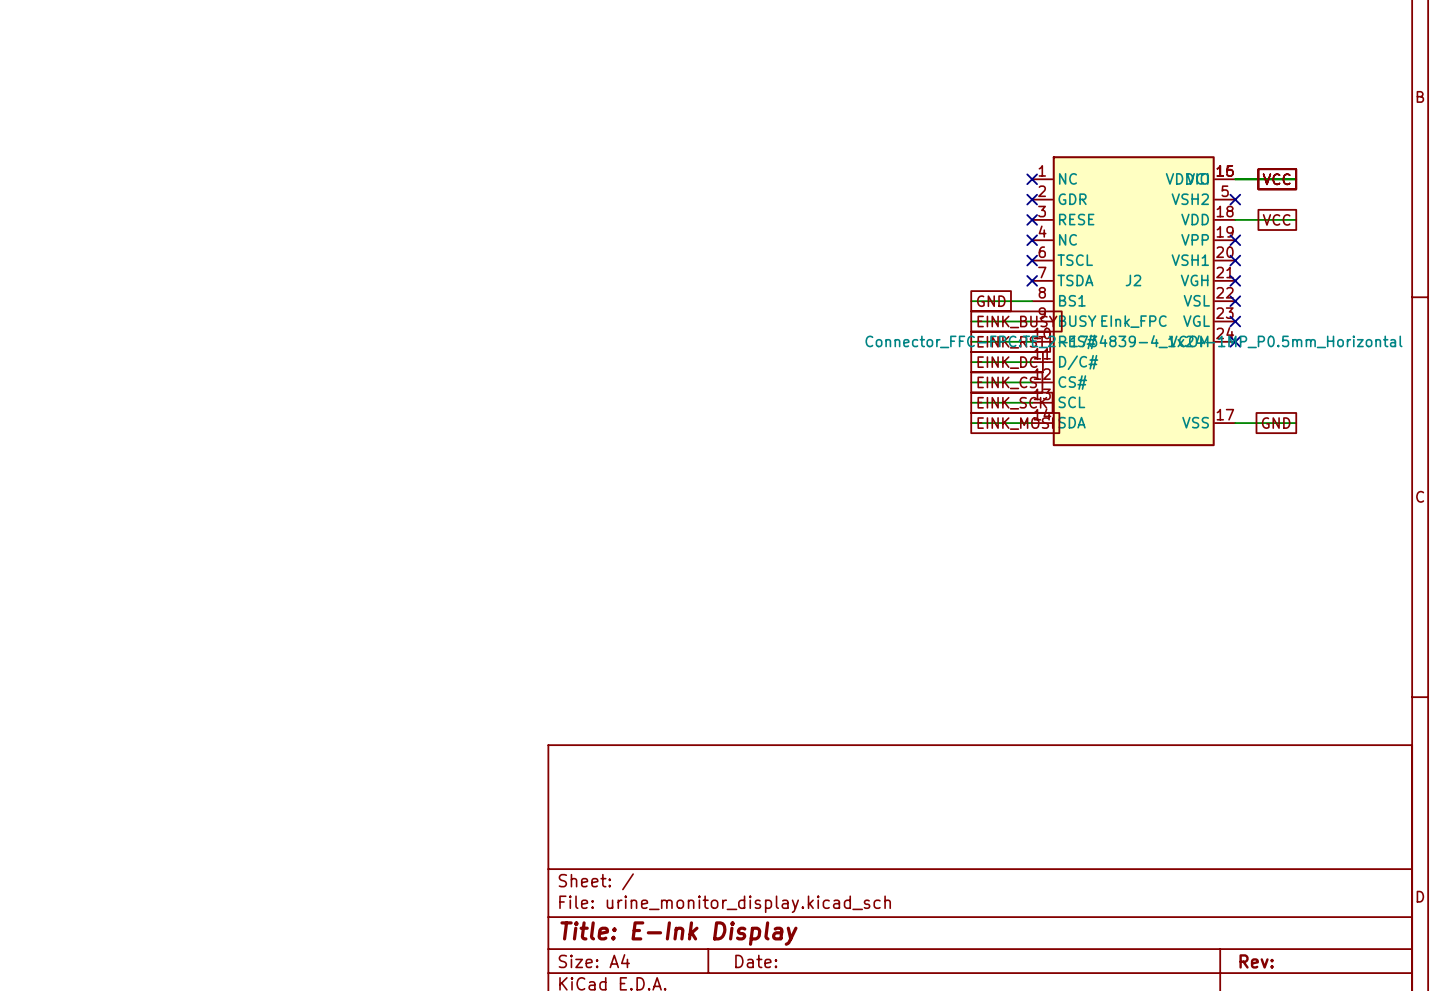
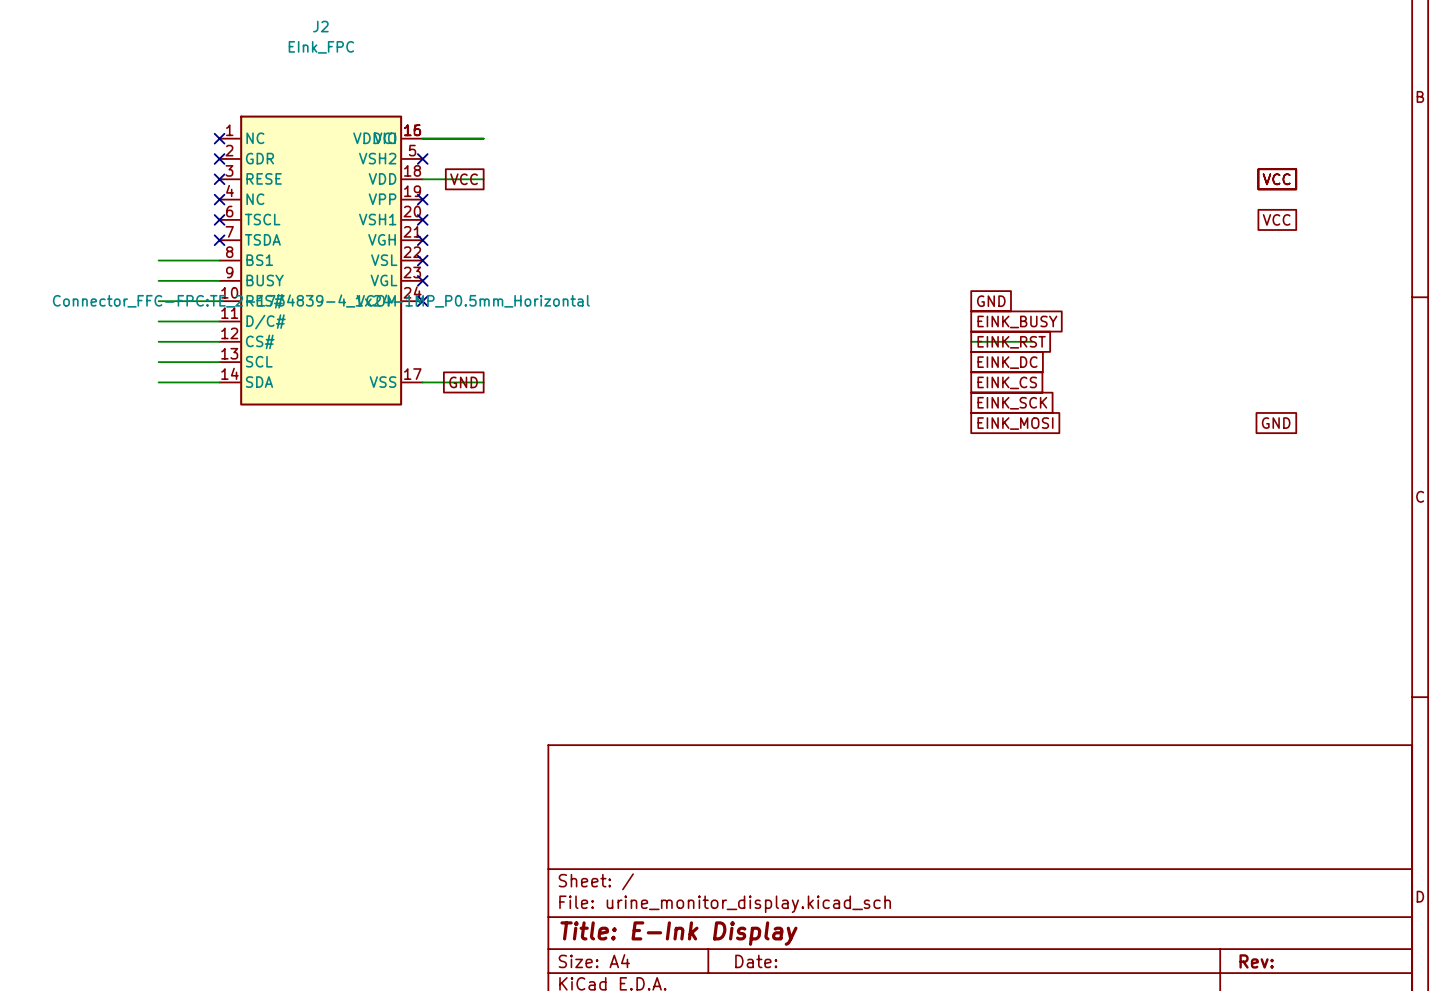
no-connect mark: none -> (219, 138)
wire: none -> (422, 138) (483, 138)
no-connect mark: none -> (219, 158)
no-connect mark: none -> (422, 158)
no-connect mark: none -> (219, 179)
wire: none -> (422, 179) (483, 179)
global label: none -> VCC (464, 179)
no-connect mark: (1032, 179) -> none
wire: (1235, 179) (1296, 179) -> none
no-connect mark: none -> (219, 199)
no-connect mark: none -> (422, 199)
no-connect mark: (1032, 199) -> none
no-connect mark: (1235, 199) -> none
no-connect mark: none -> (219, 219)
no-connect mark: none -> (422, 219)
no-connect mark: (1032, 219) -> none
wire: (1235, 219) (1296, 219) -> none
no-connect mark: none -> (219, 240)
no-connect mark: none -> (422, 240)
no-connect mark: (1032, 240) -> none
no-connect mark: (1235, 240) -> none
wire: none -> (158, 260) (219, 260)
no-connect mark: none -> (422, 260)
no-connect mark: (1032, 260) -> none
no-connect mark: (1235, 260) -> none
wire: none -> (158, 280) (219, 280)
no-connect mark: none -> (422, 280)
no-connect mark: (1032, 280) -> none
J2 name position: J2 (1133, 280) -> J2 (320, 26)
no-connect mark: (1235, 280) -> none
wire: none -> (158, 301) (219, 301)
no-connect mark: none -> (422, 301)
wire: (971, 301) (1032, 301) -> none
J2 position: (1133, 301) -> (321, 260)
no-connect mark: (1235, 301) -> none
wire: none -> (158, 321) (219, 321)
wire: (971, 321) (1032, 321) -> none
J2 value position: EInk_FPC (1133, 321) -> EInk_FPC (321, 47)
no-connect mark: (1235, 321) -> none
wire: none -> (158, 341) (219, 341)
no-connect mark: (1235, 341) -> none
wire: none -> (158, 362) (219, 362)
wire: (971, 362) (1032, 362) -> none
wire: none -> (158, 382) (219, 382)
wire: none -> (422, 382) (483, 382)
global label: none -> GND (463, 382)
wire: (971, 382) (1032, 382) -> none
wire: (971, 402) (1032, 402) -> none
wire: (971, 423) (1032, 423) -> none
wire: (1235, 423) (1296, 423) -> none

